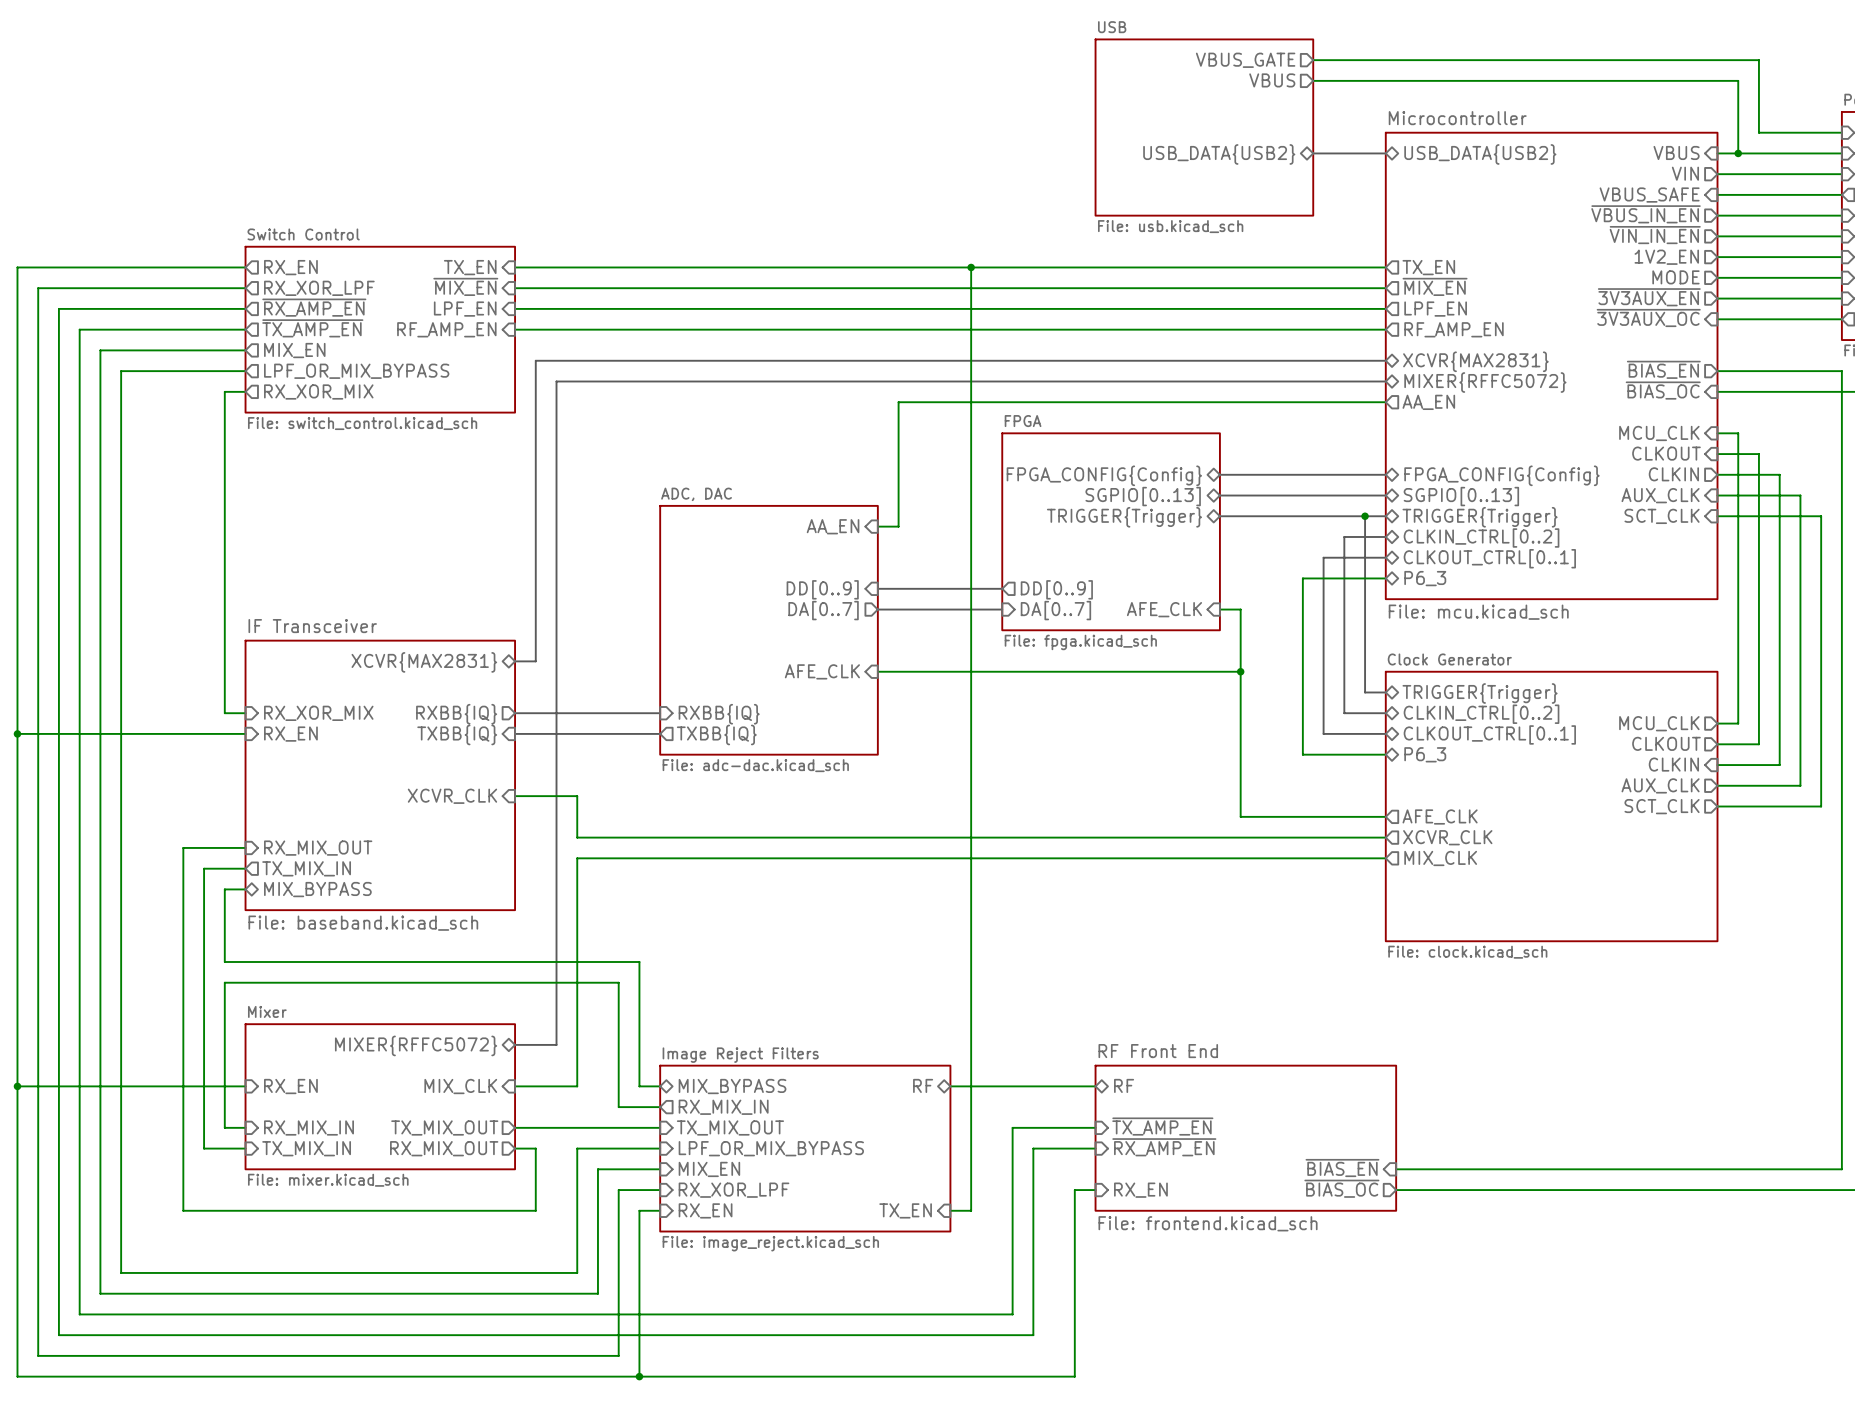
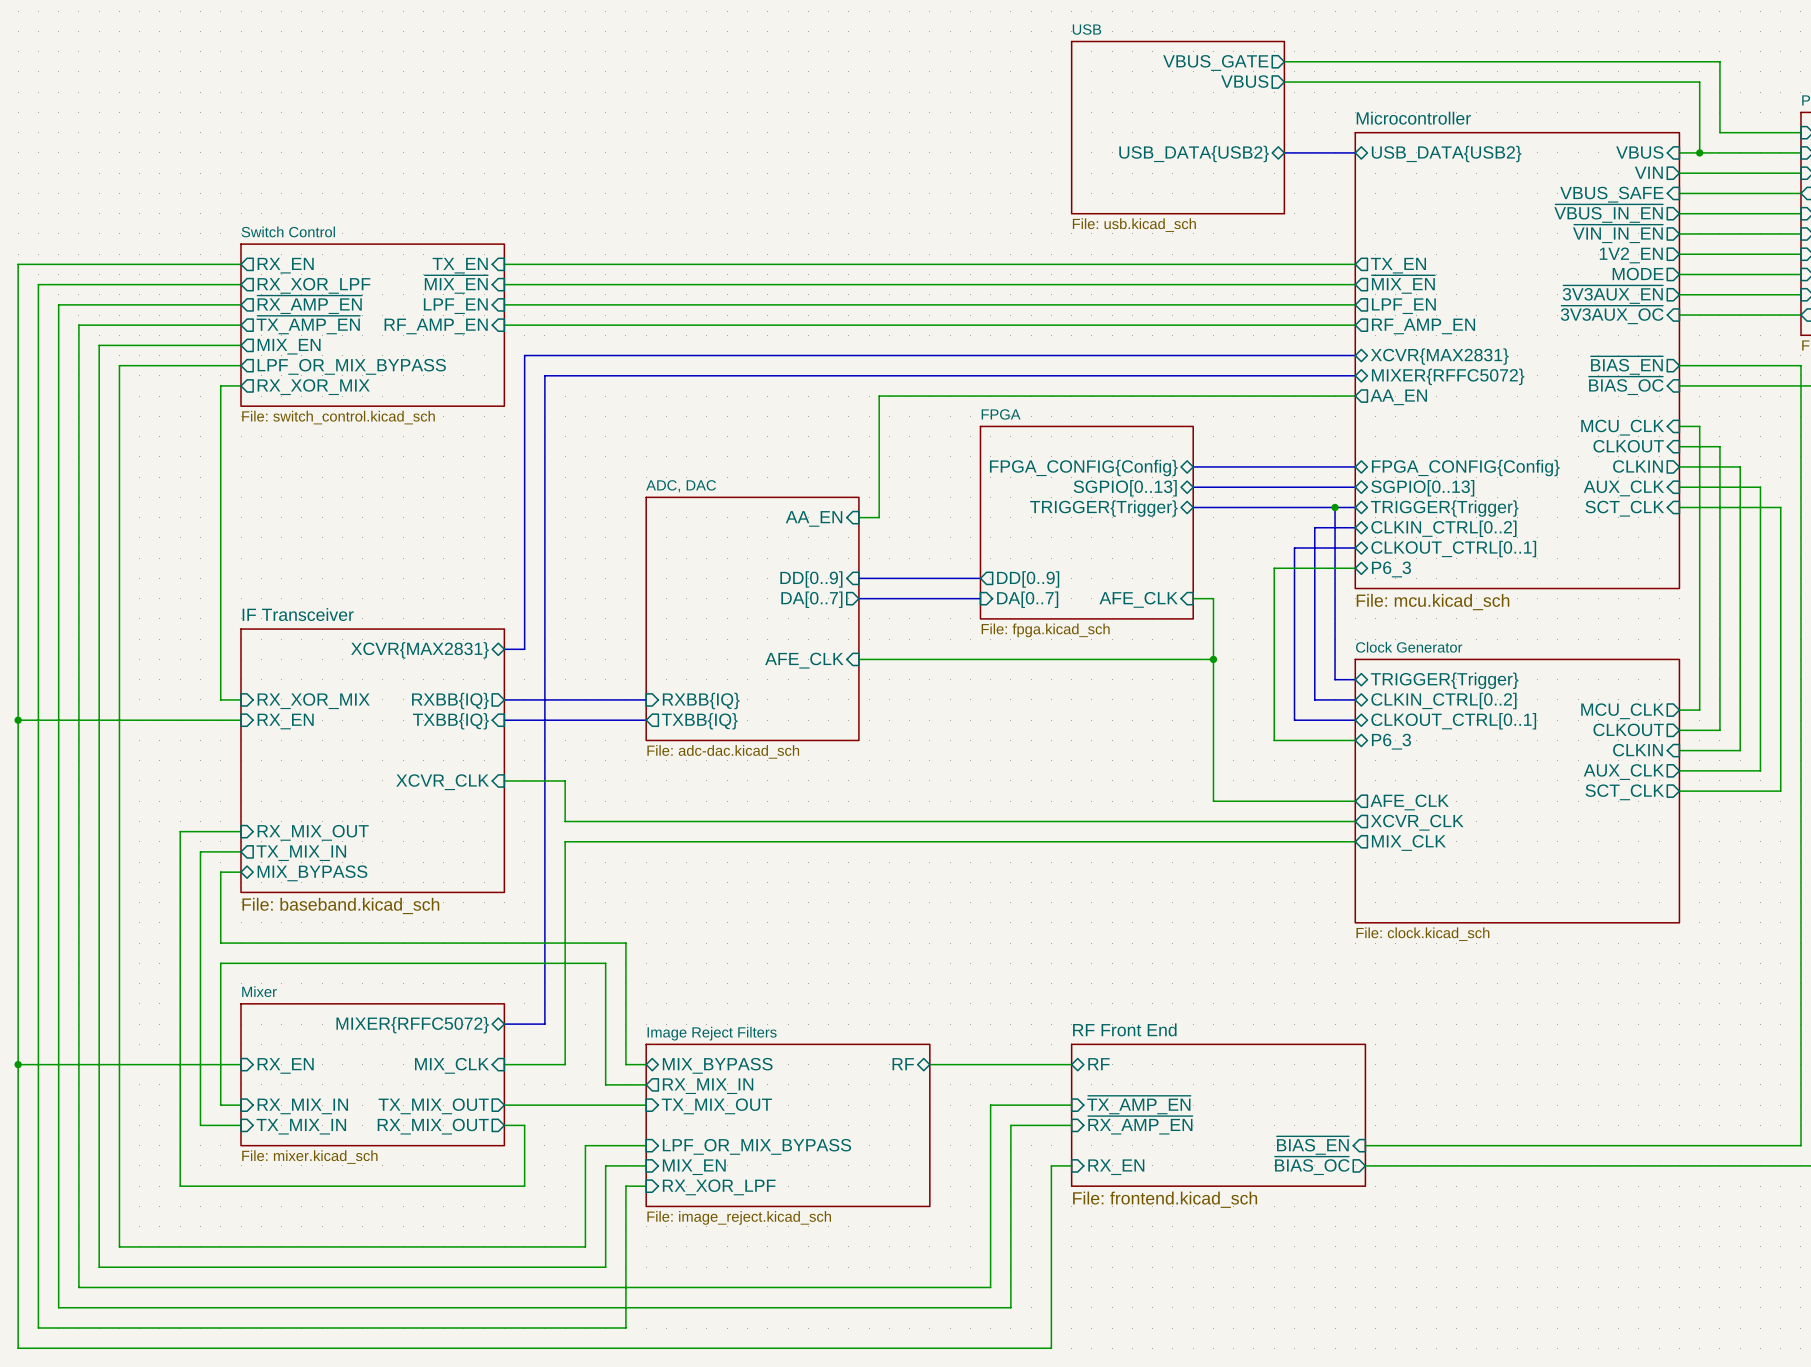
wire: (971, 267) (971, 1210) (950, 1210) -> none
junction: (971, 267) -> none
wire: (660, 1148) (577, 1148) (577, 1272) -> none
sheet pin: LPF_OR_MIX_BYPASS (771, 1148) -> none
sheet pin: MIX_EN (709, 1169) -> LPF_OR_MIX_BYPASS (756, 1146)
sheet pin: RX_XOR_LPF (734, 1190) -> MIX_EN (694, 1167)
sheet pin: RX_EN (705, 1210) -> RX_XOR_LPF (719, 1187)
sheet pin: TX_EN (905, 1210) -> none
wire: (597, 1272) (597, 1293) -> (585, 1246) (565, 1246)
wire: (618, 1293) (618, 1355) -> (605, 1267) (585, 1267)
wire: (639, 1355) (639, 1376) -> (625, 1328) (605, 1328)
junction: (639, 1376) -> none

